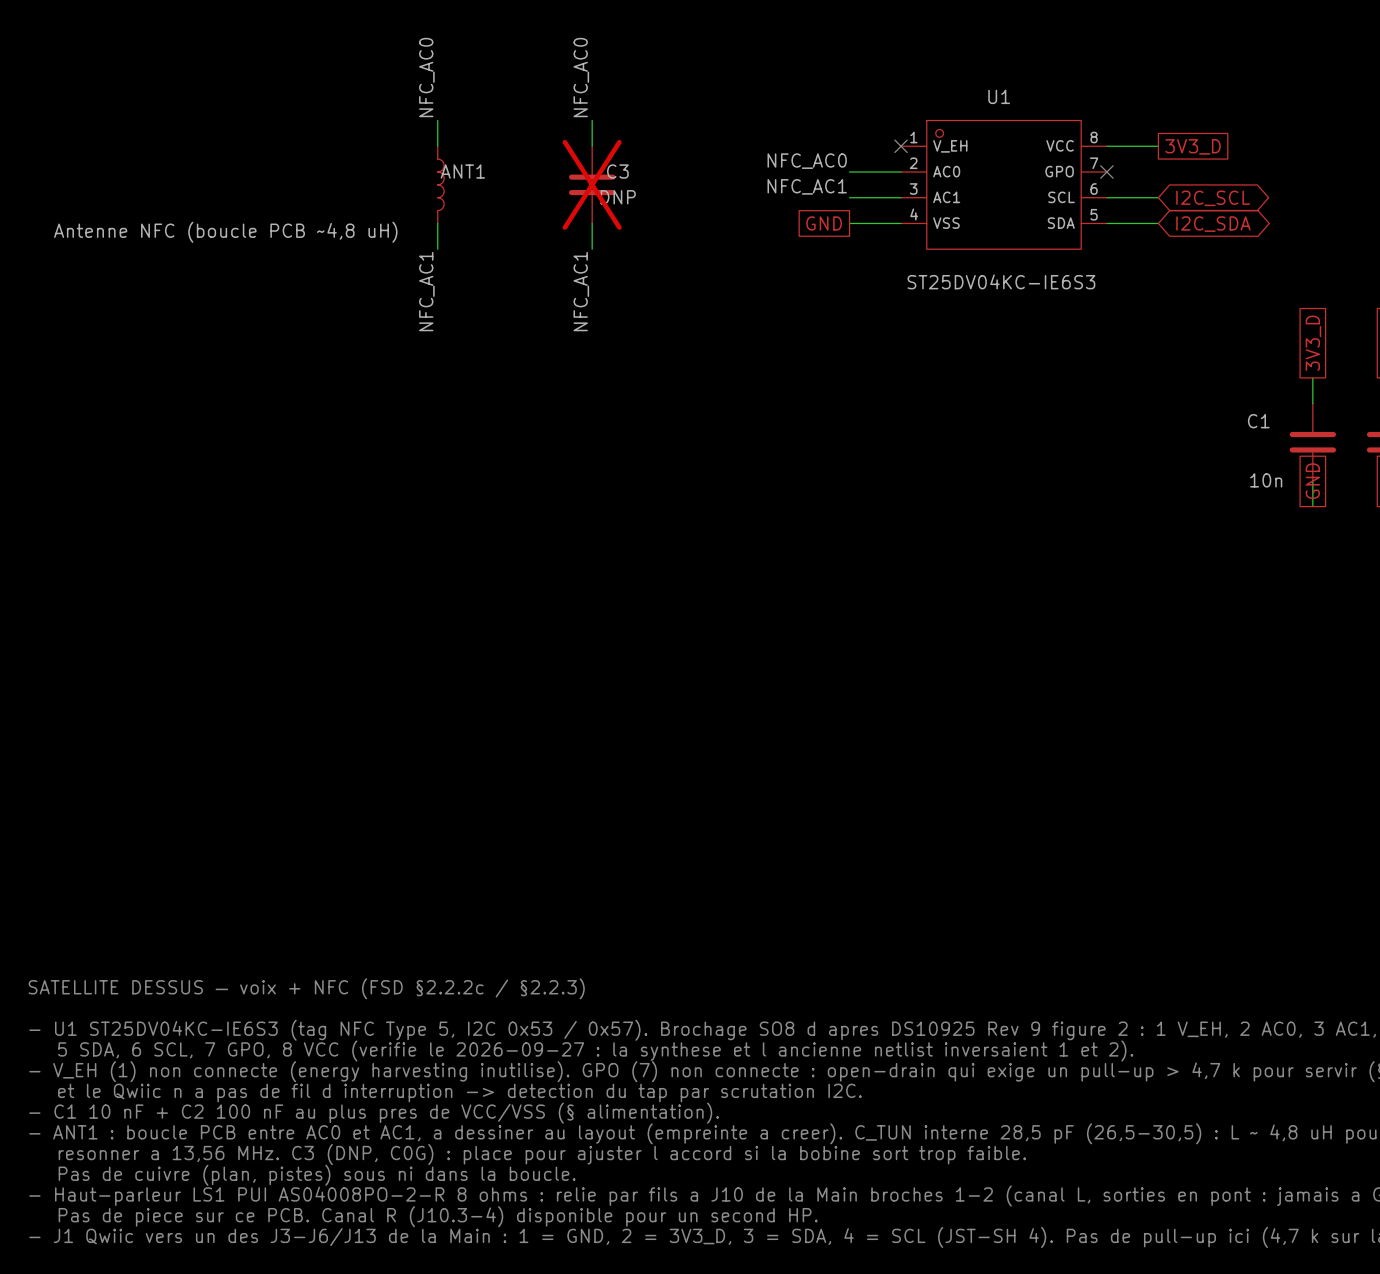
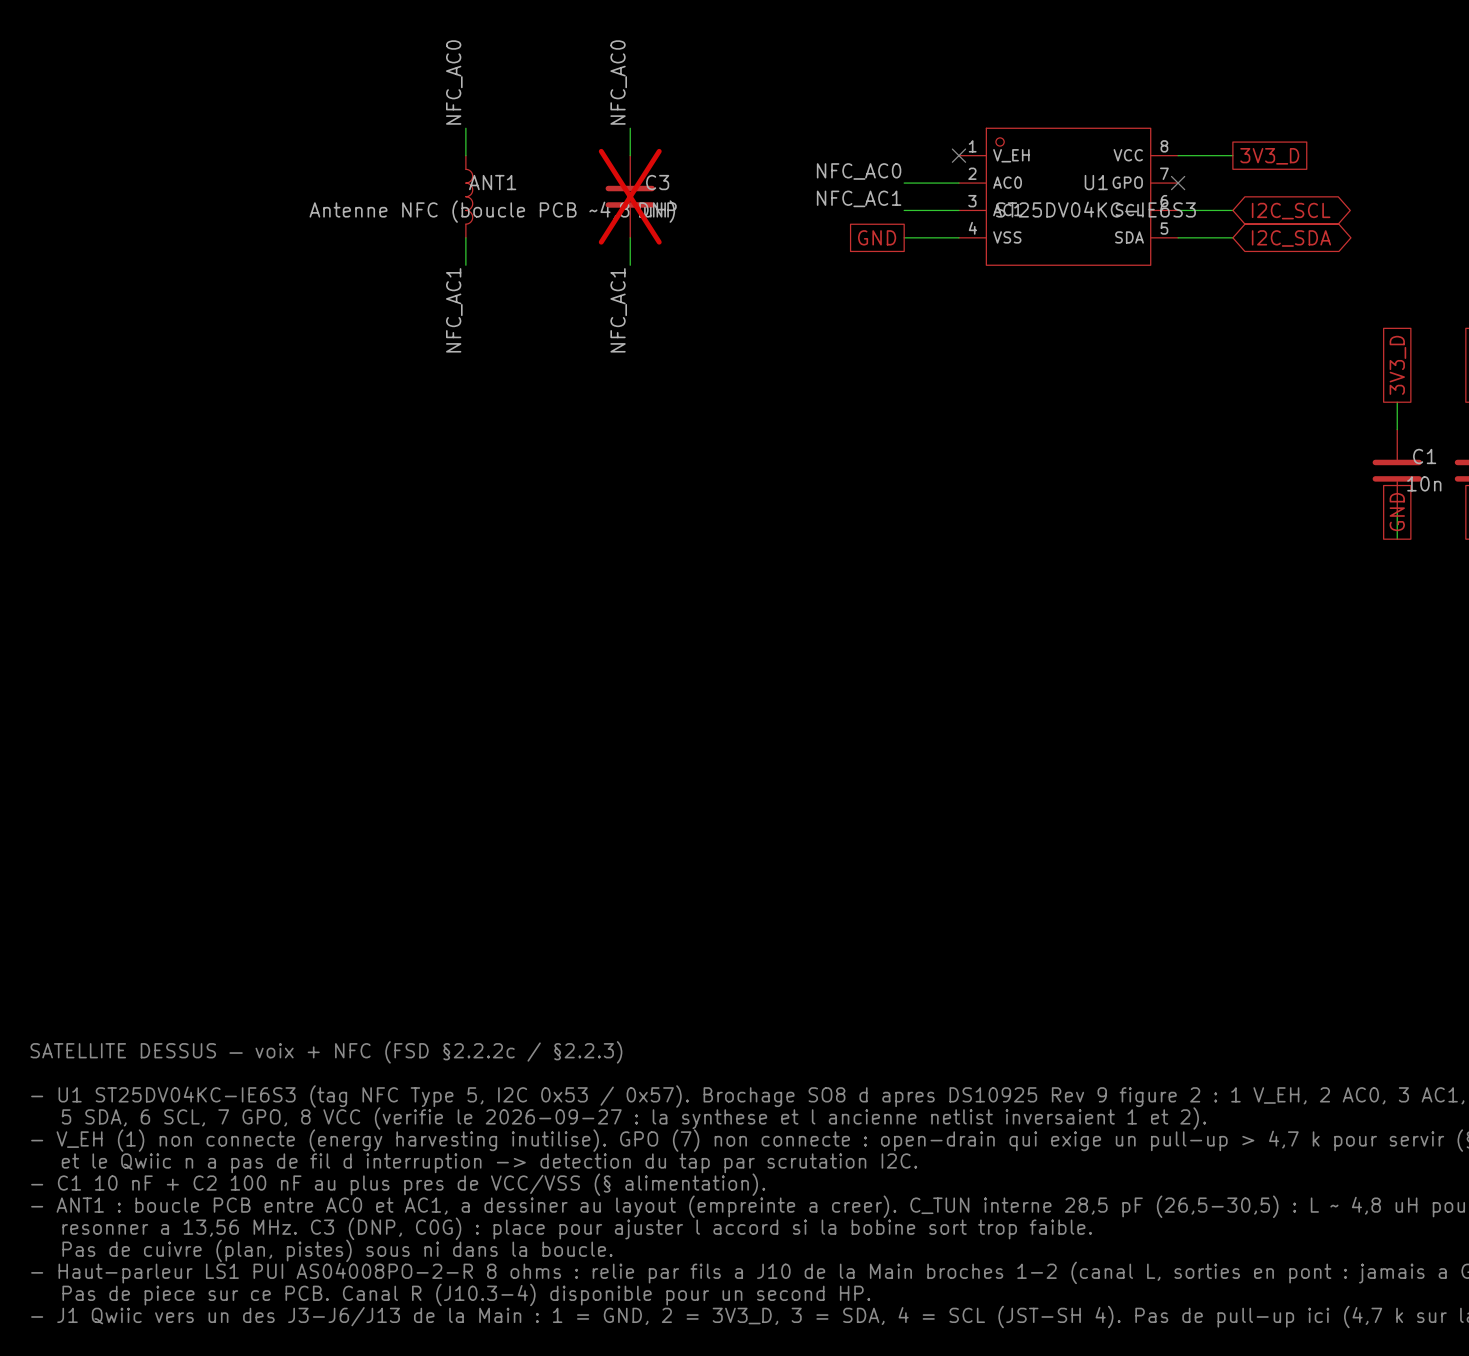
U1 name position: U1 (999, 96) -> U1 (1096, 182)
ANT1 value position: Antenne NFC (boucle PCB ~4,8 uH) (225, 232) -> Antenne NFC (boucle PCB ~4,8 uH) (492, 211)
U1 value position: ST25DV04KC-IE6S3 (1001, 281) -> ST25DV04KC-IE6S3 (1095, 209)
C1 name position: C1 (1258, 421) -> C1 (1424, 456)
C1 value position: 10n (1266, 480) -> 10n (1424, 483)

